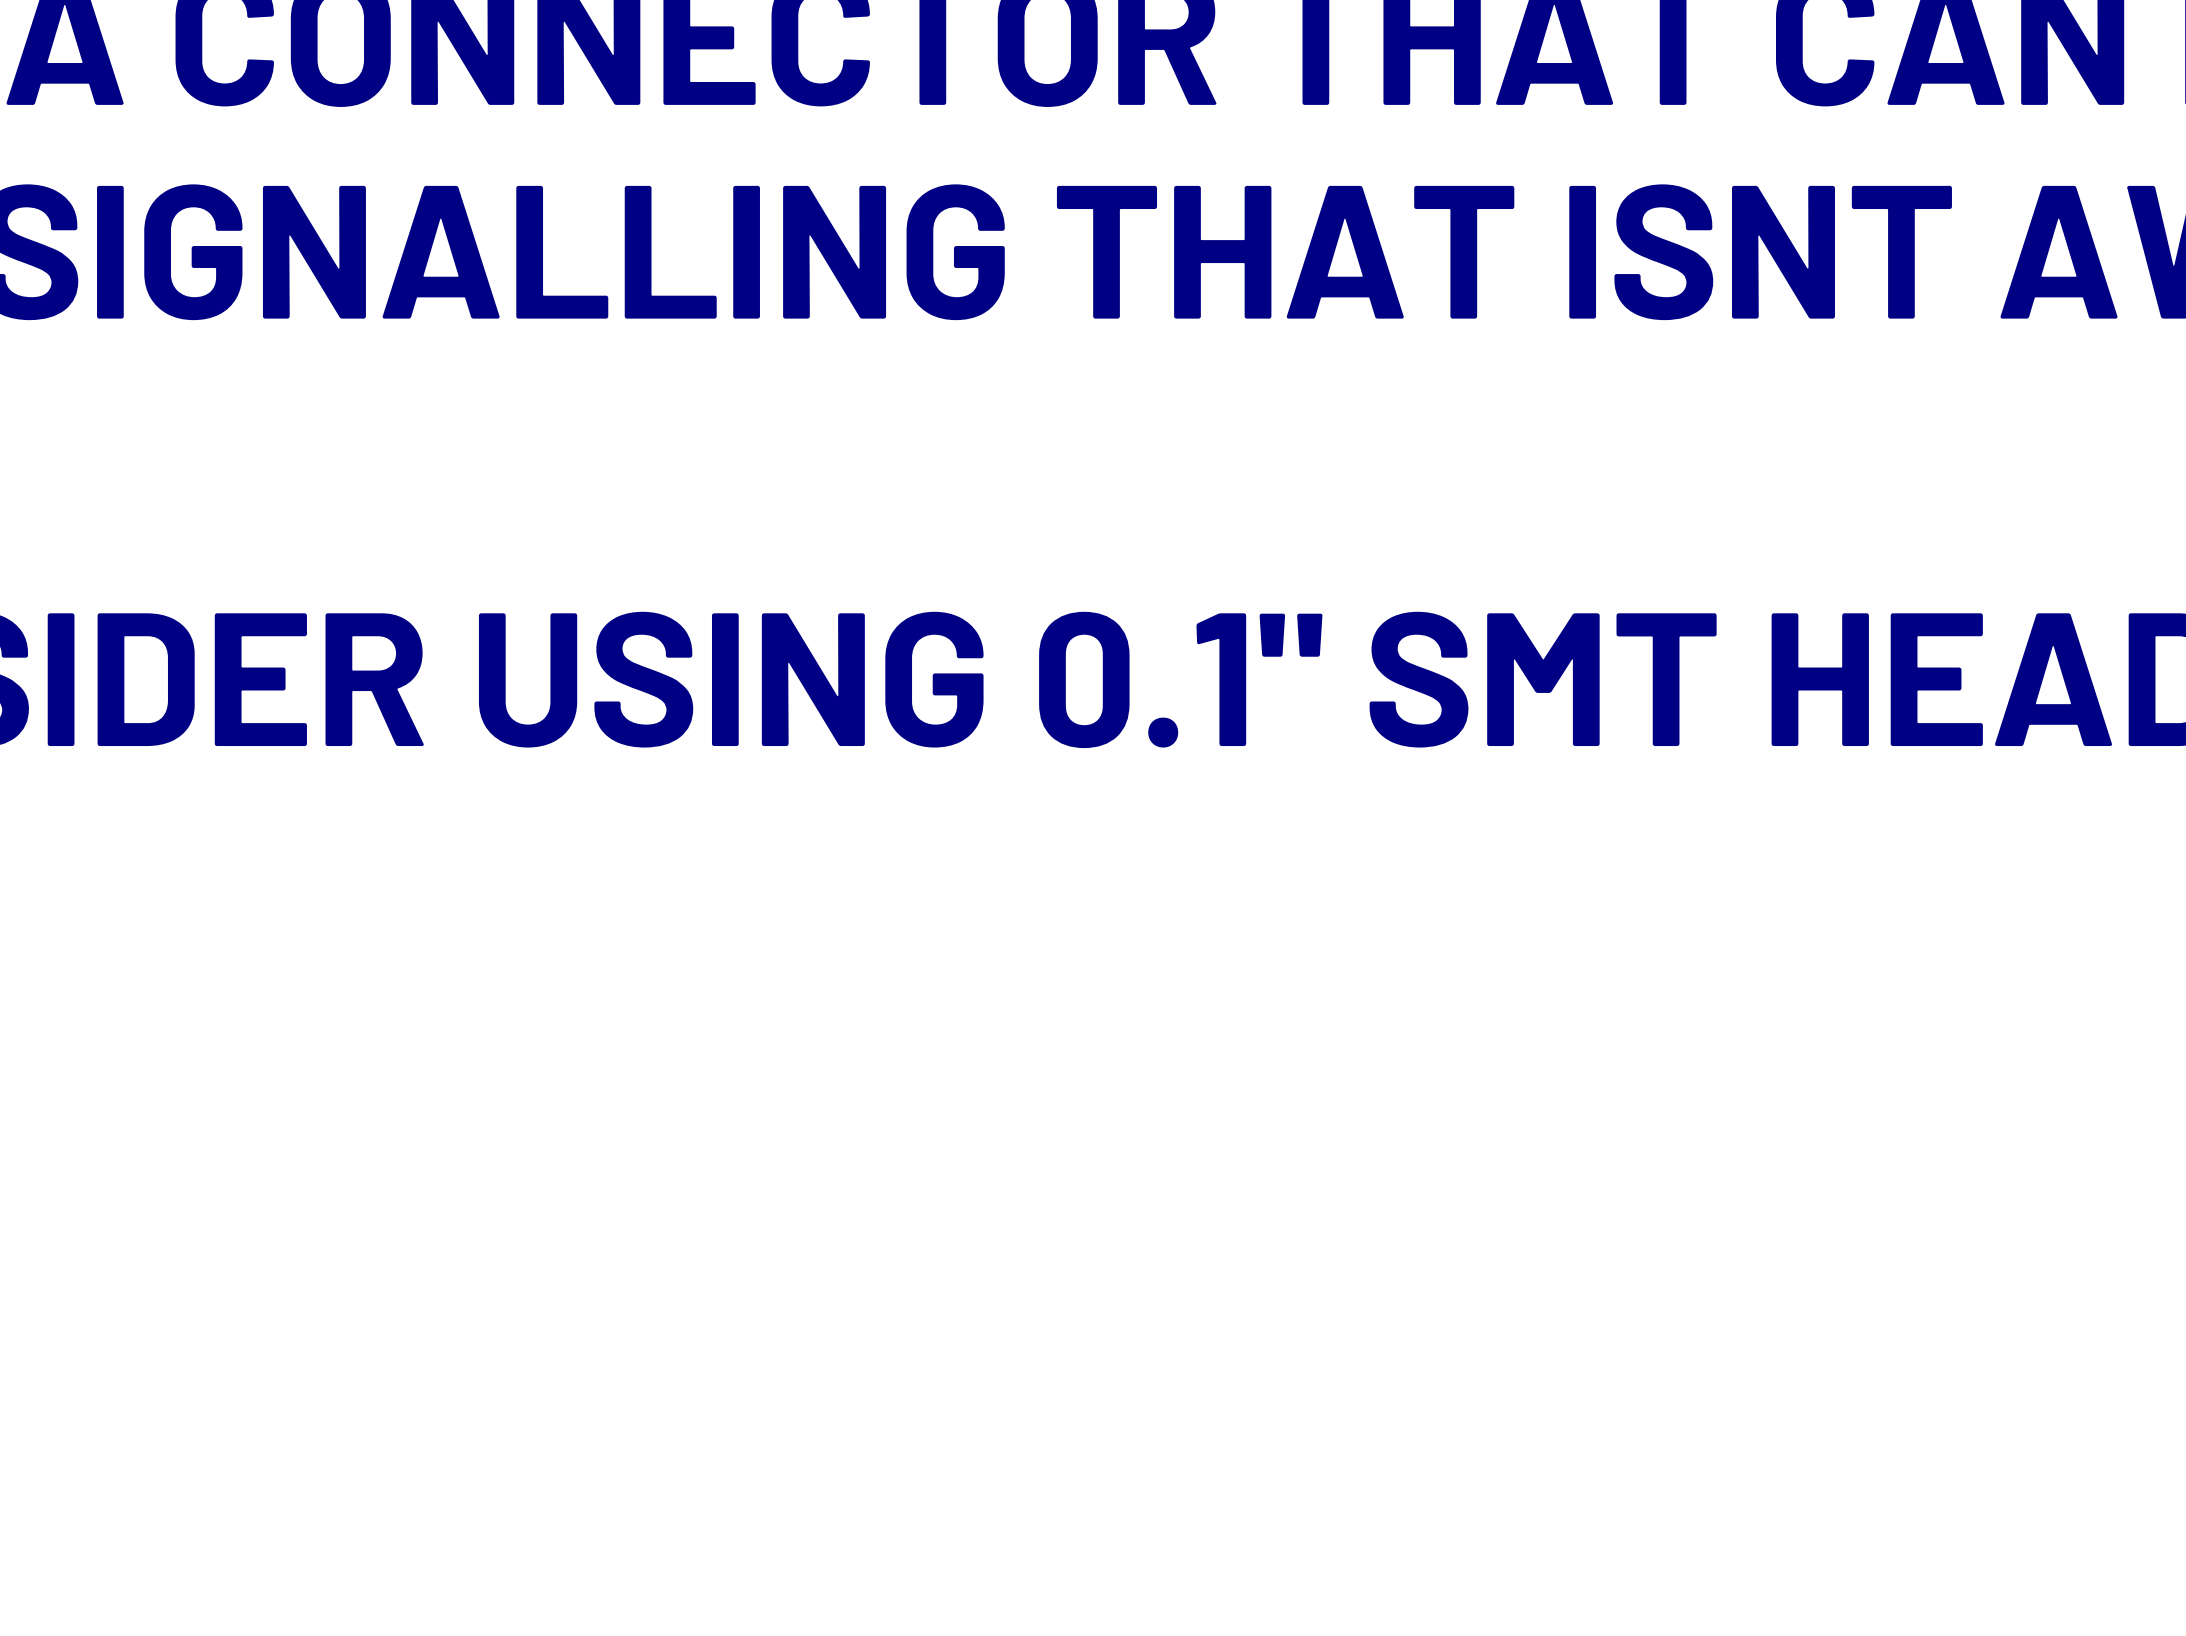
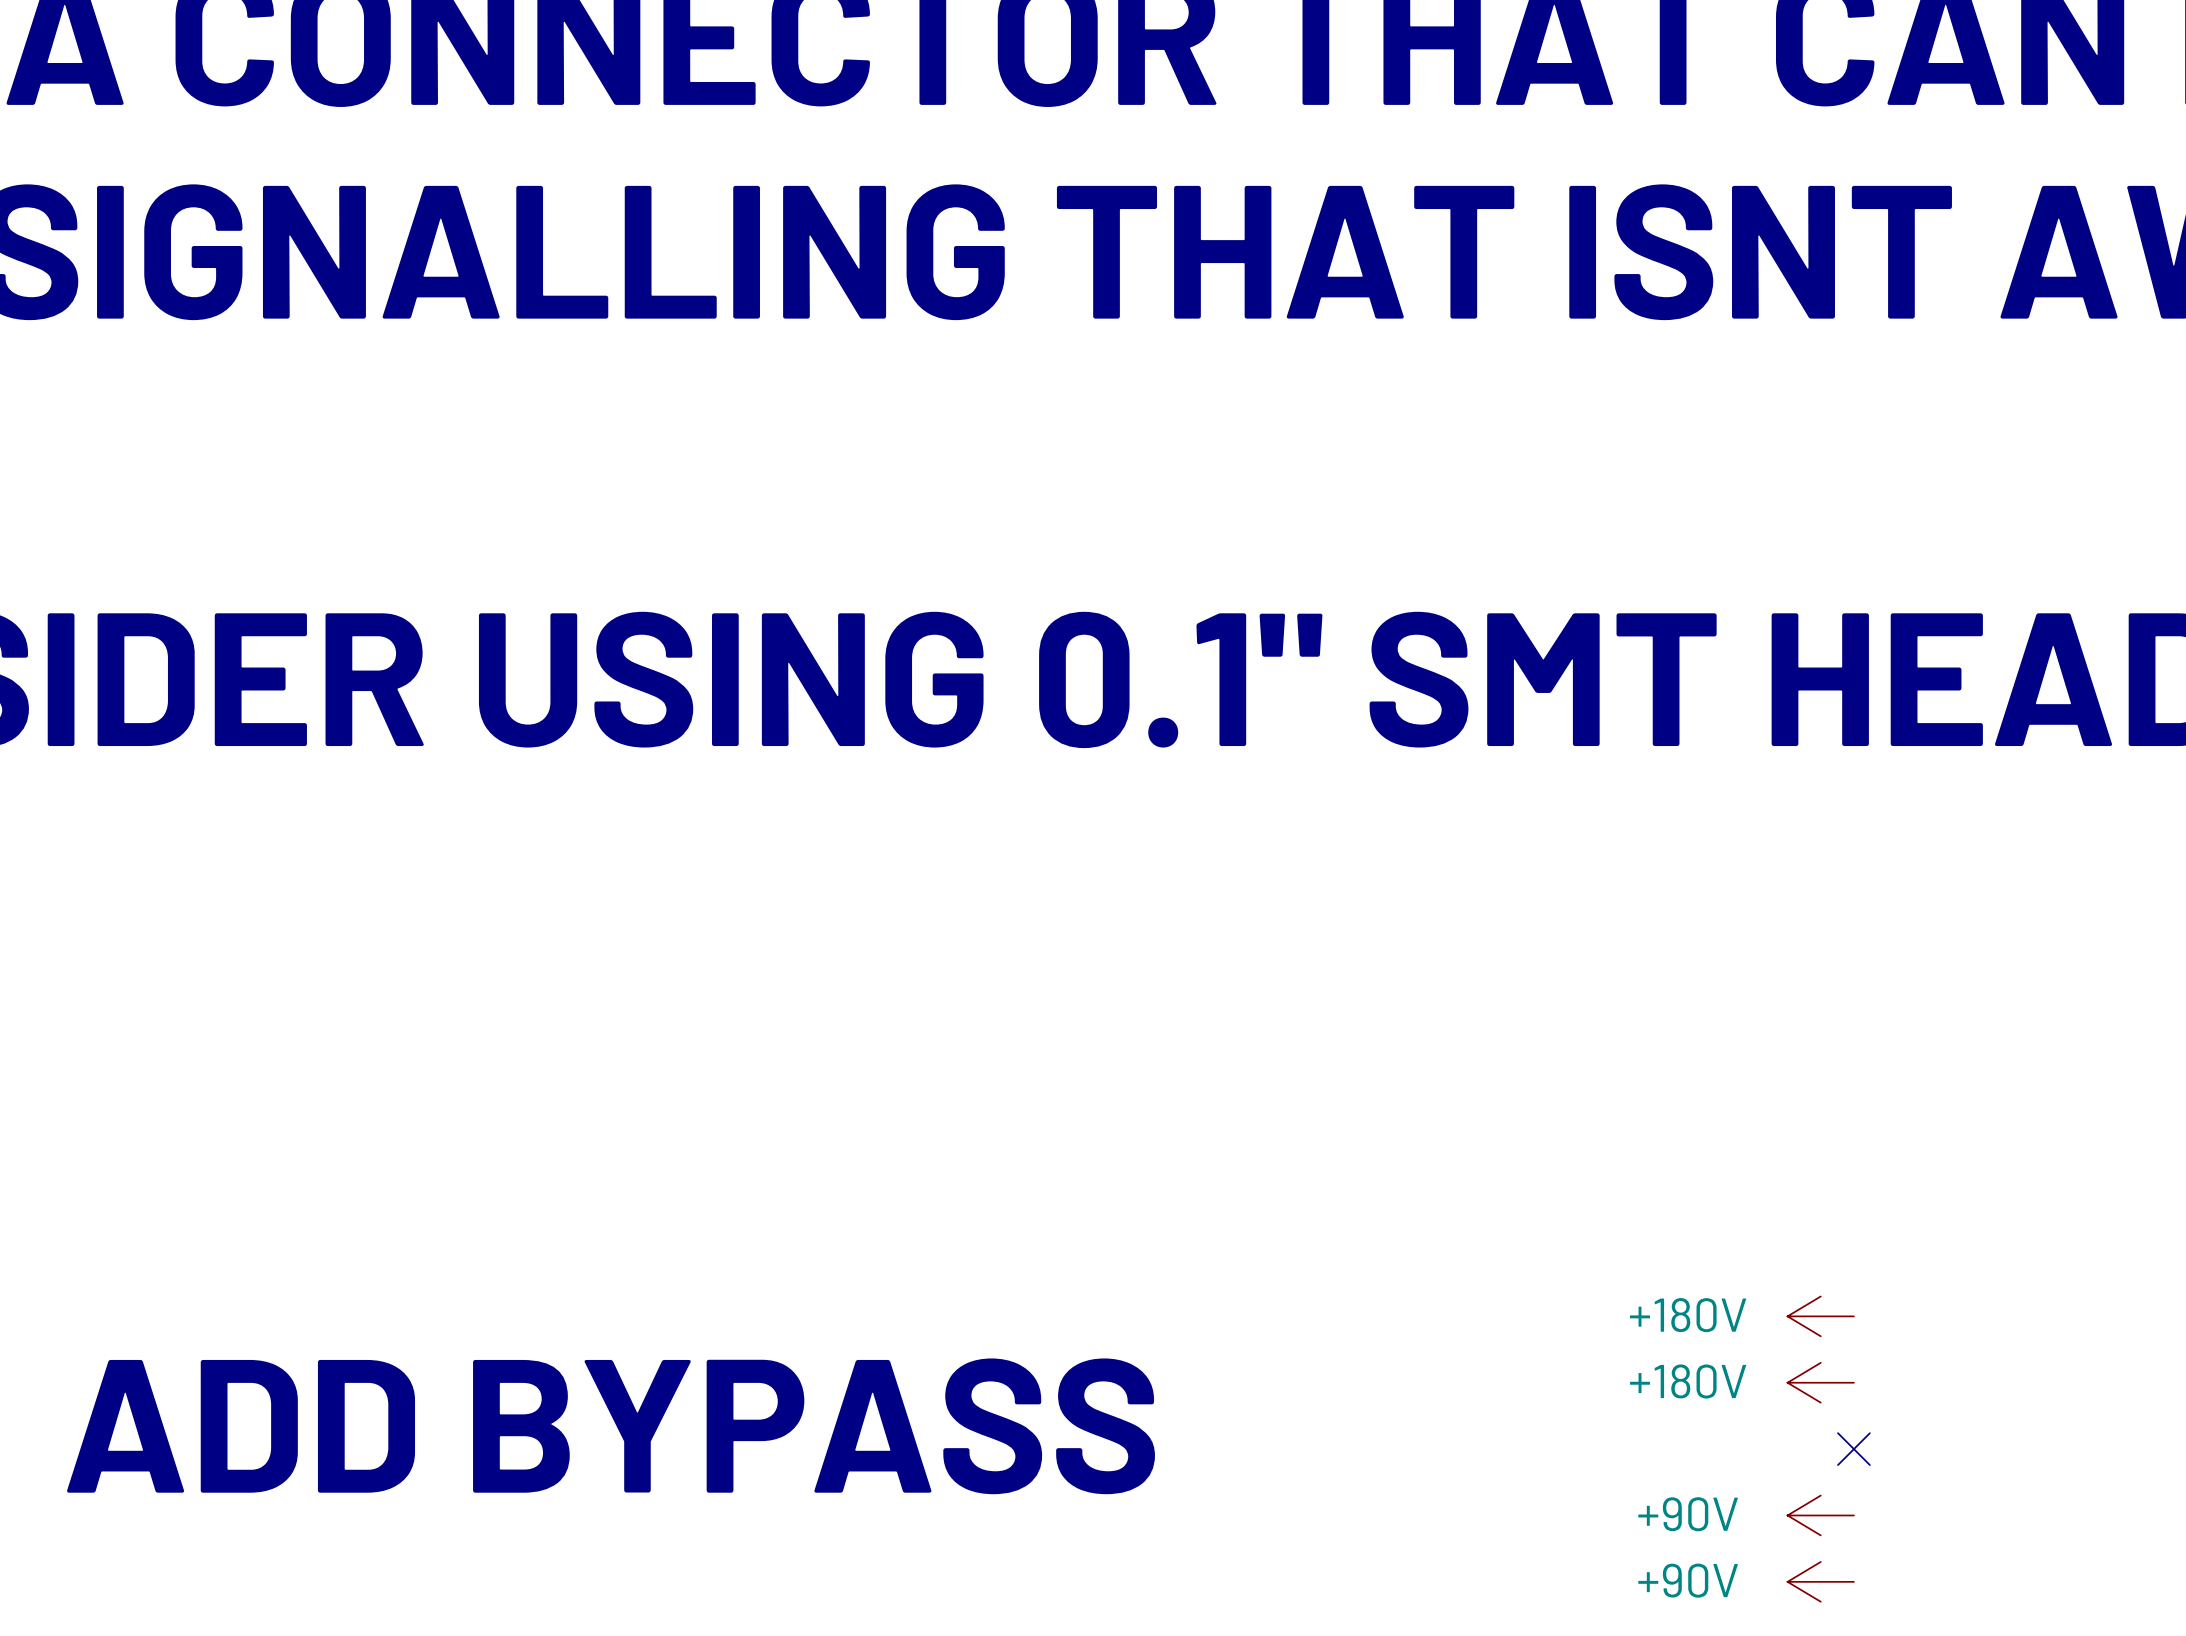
power symbol: none -> +180V (1820, 1316)
power symbol: none -> +180V (1820, 1382)
text: none -> ADD BYPASS (610, 1426)
no-connect mark: none -> (1853, 1449)
power symbol: none -> +90V (1820, 1515)
power symbol: none -> +90V (1820, 1581)

